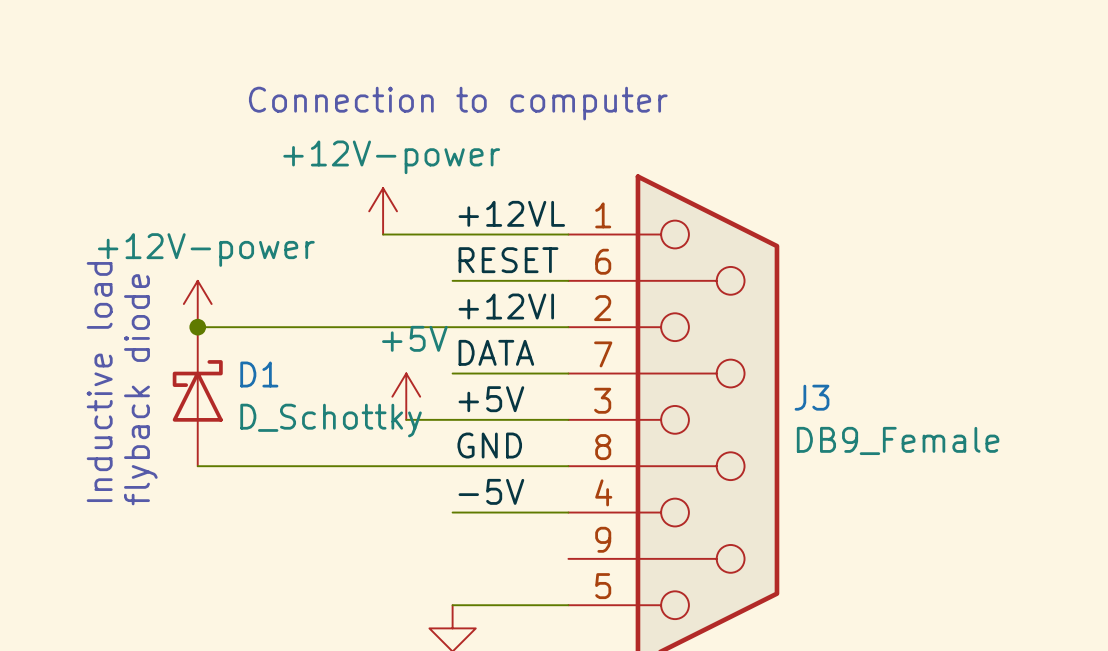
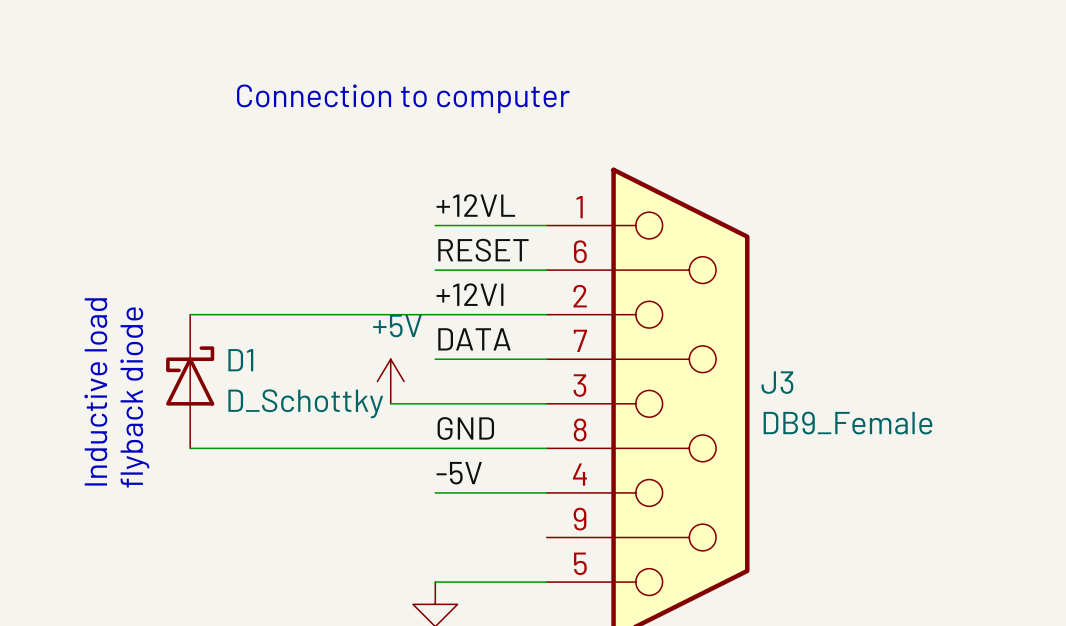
power symbol: +12V-power (383, 211) -> none
wire: (383, 234) (452, 234) -> none
power symbol: +12V-power (197, 304) -> none
junction: (197, 327) -> none
label: +5V (491, 399) -> none

